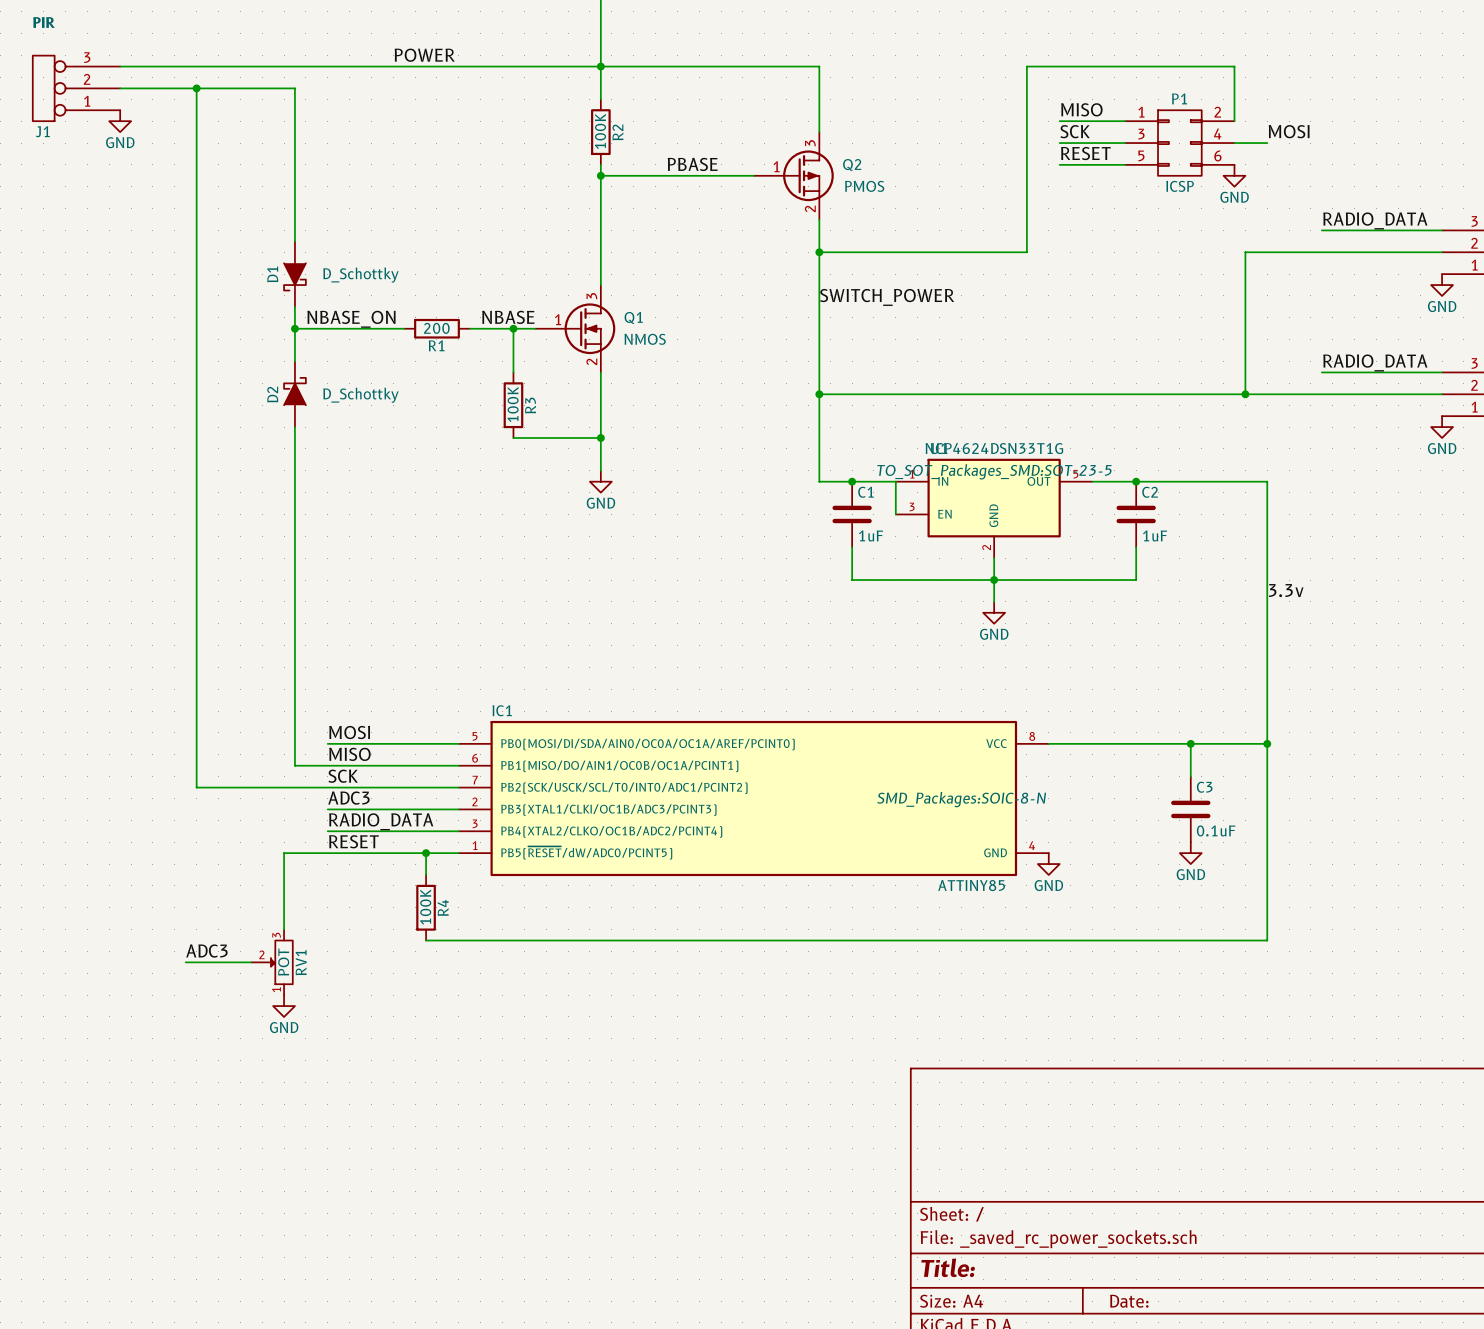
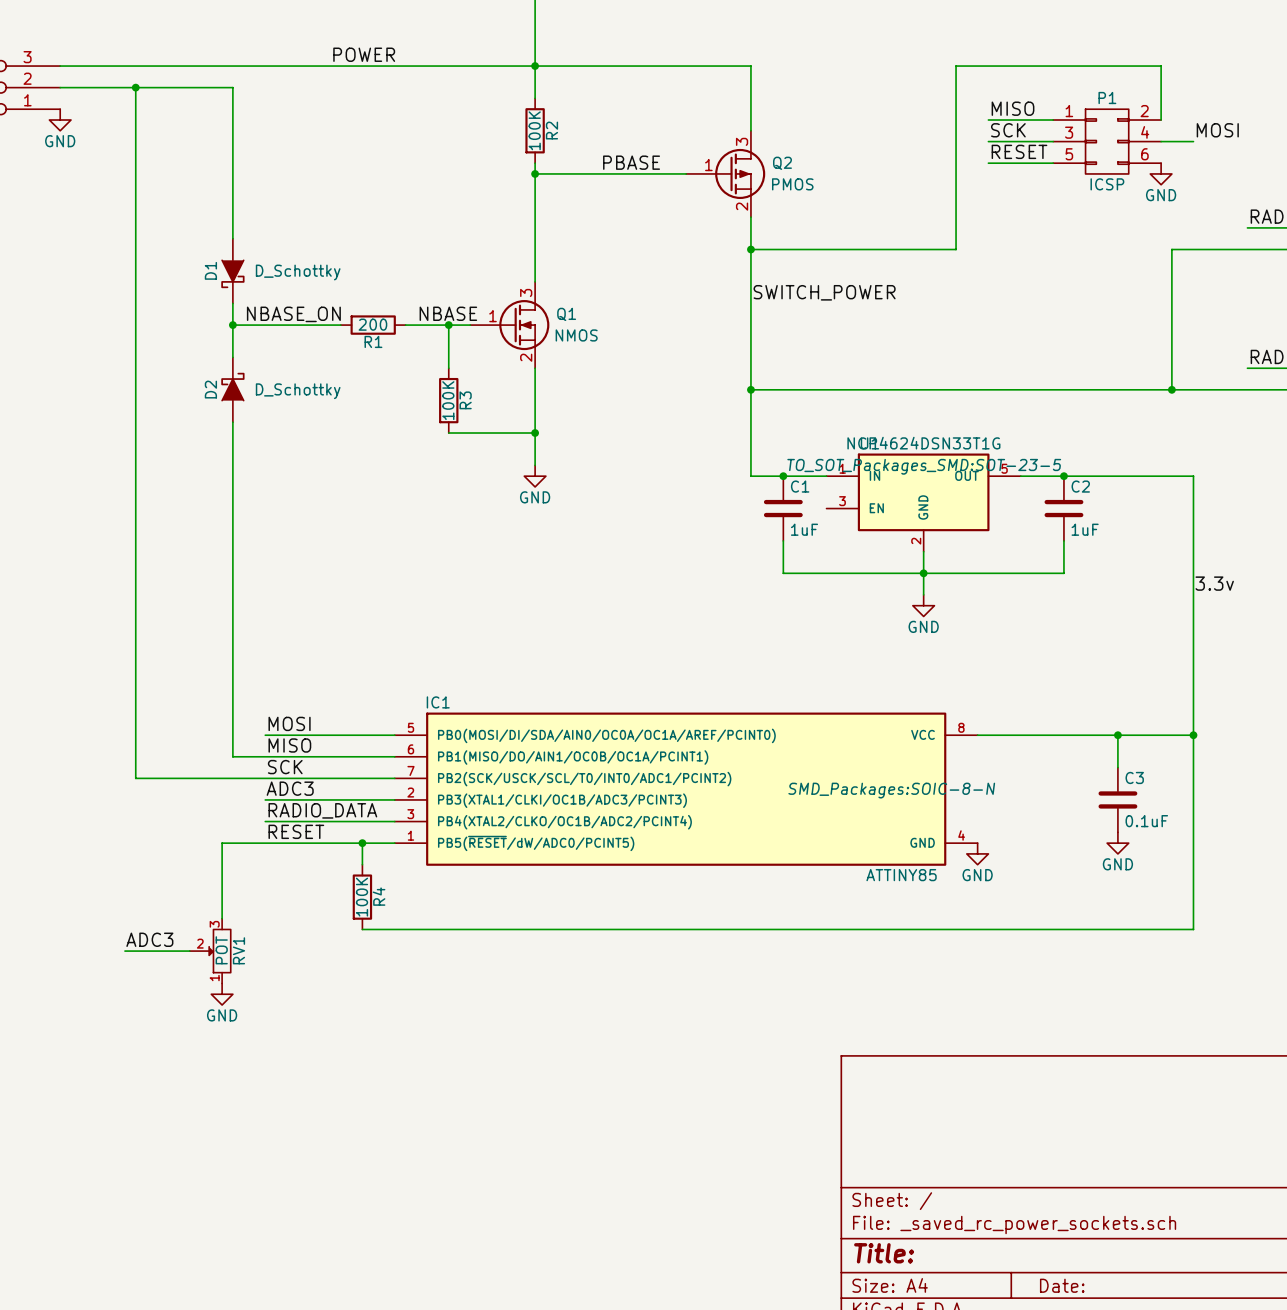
wire: (895, 481) (895, 514) -> none

